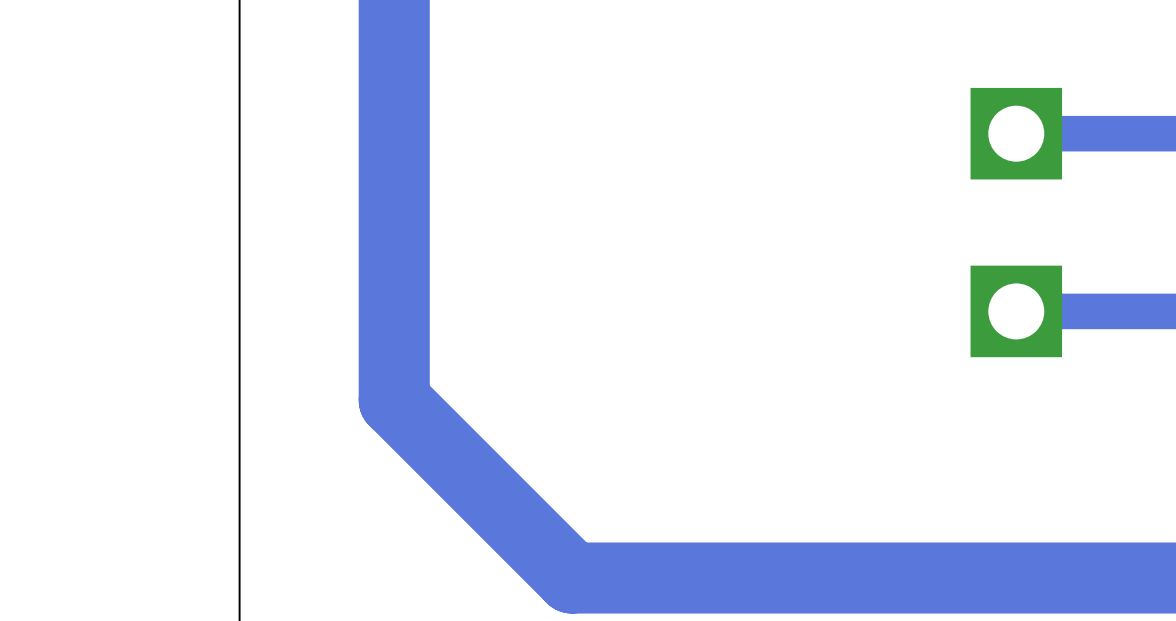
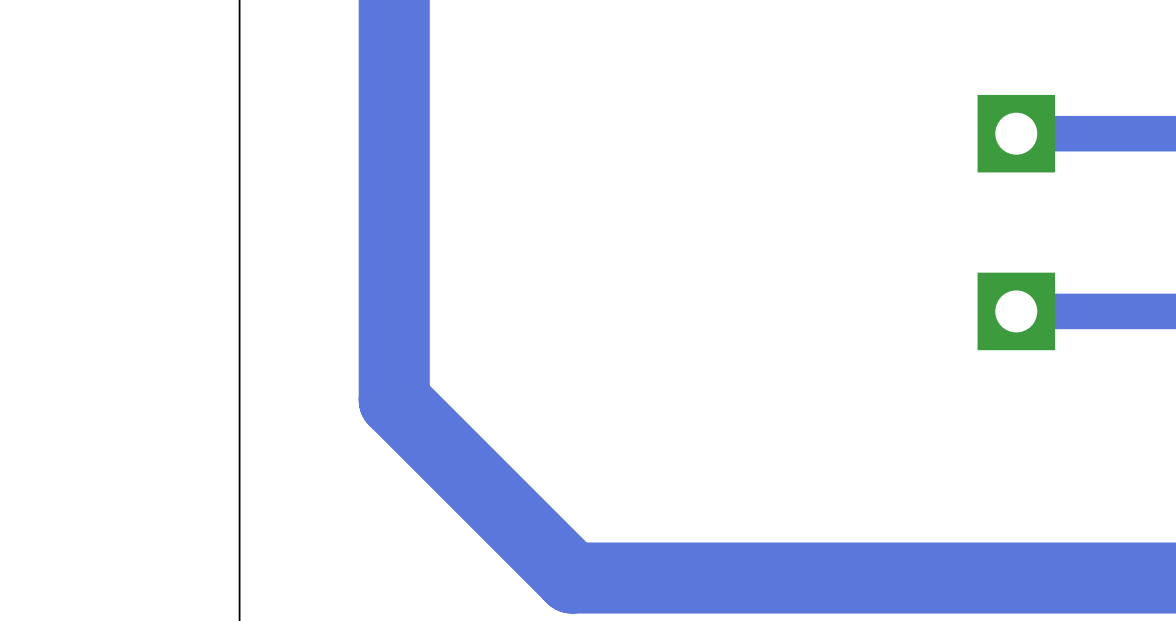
part footprint: [970, 87, 1063, 358] -> [977, 94, 1056, 351]

